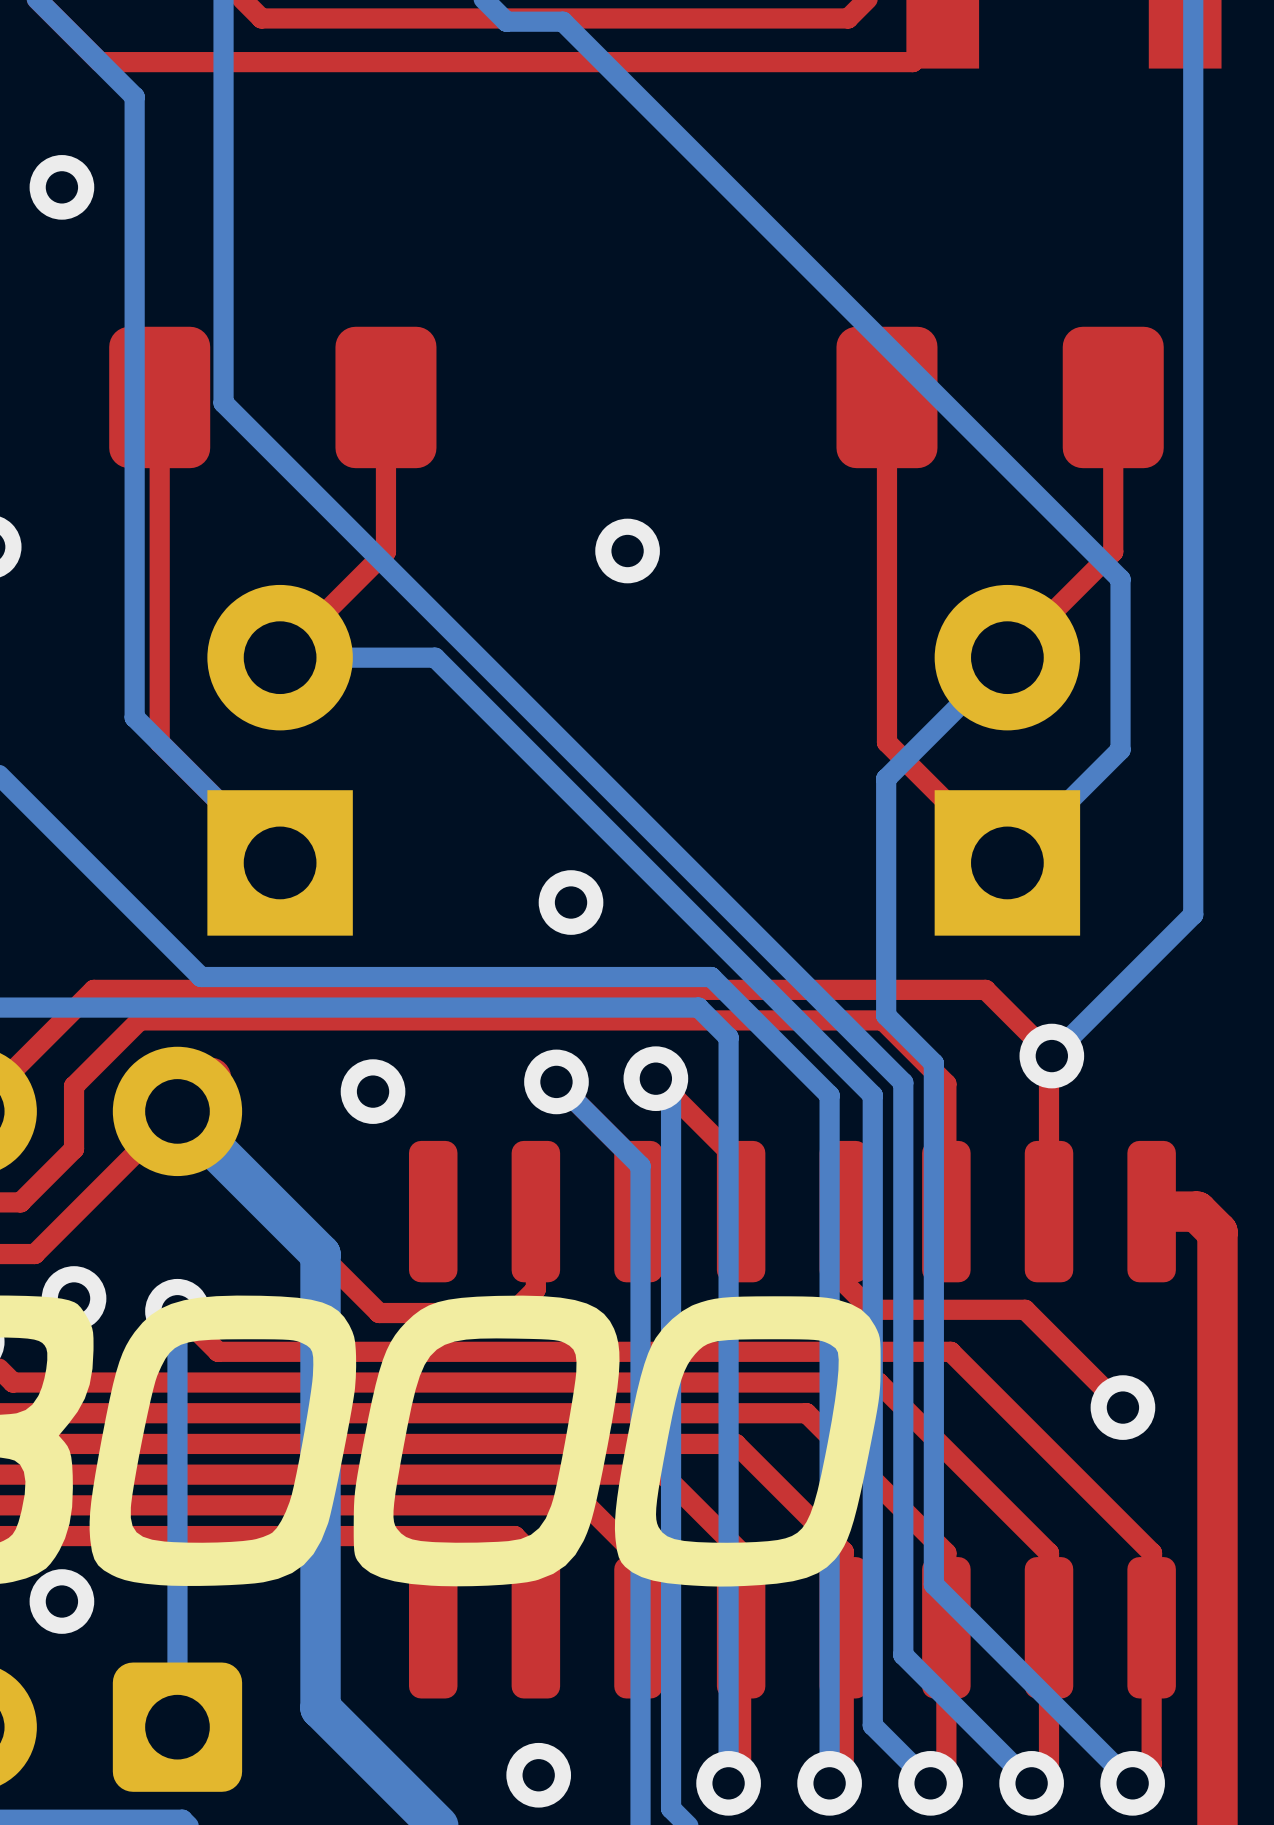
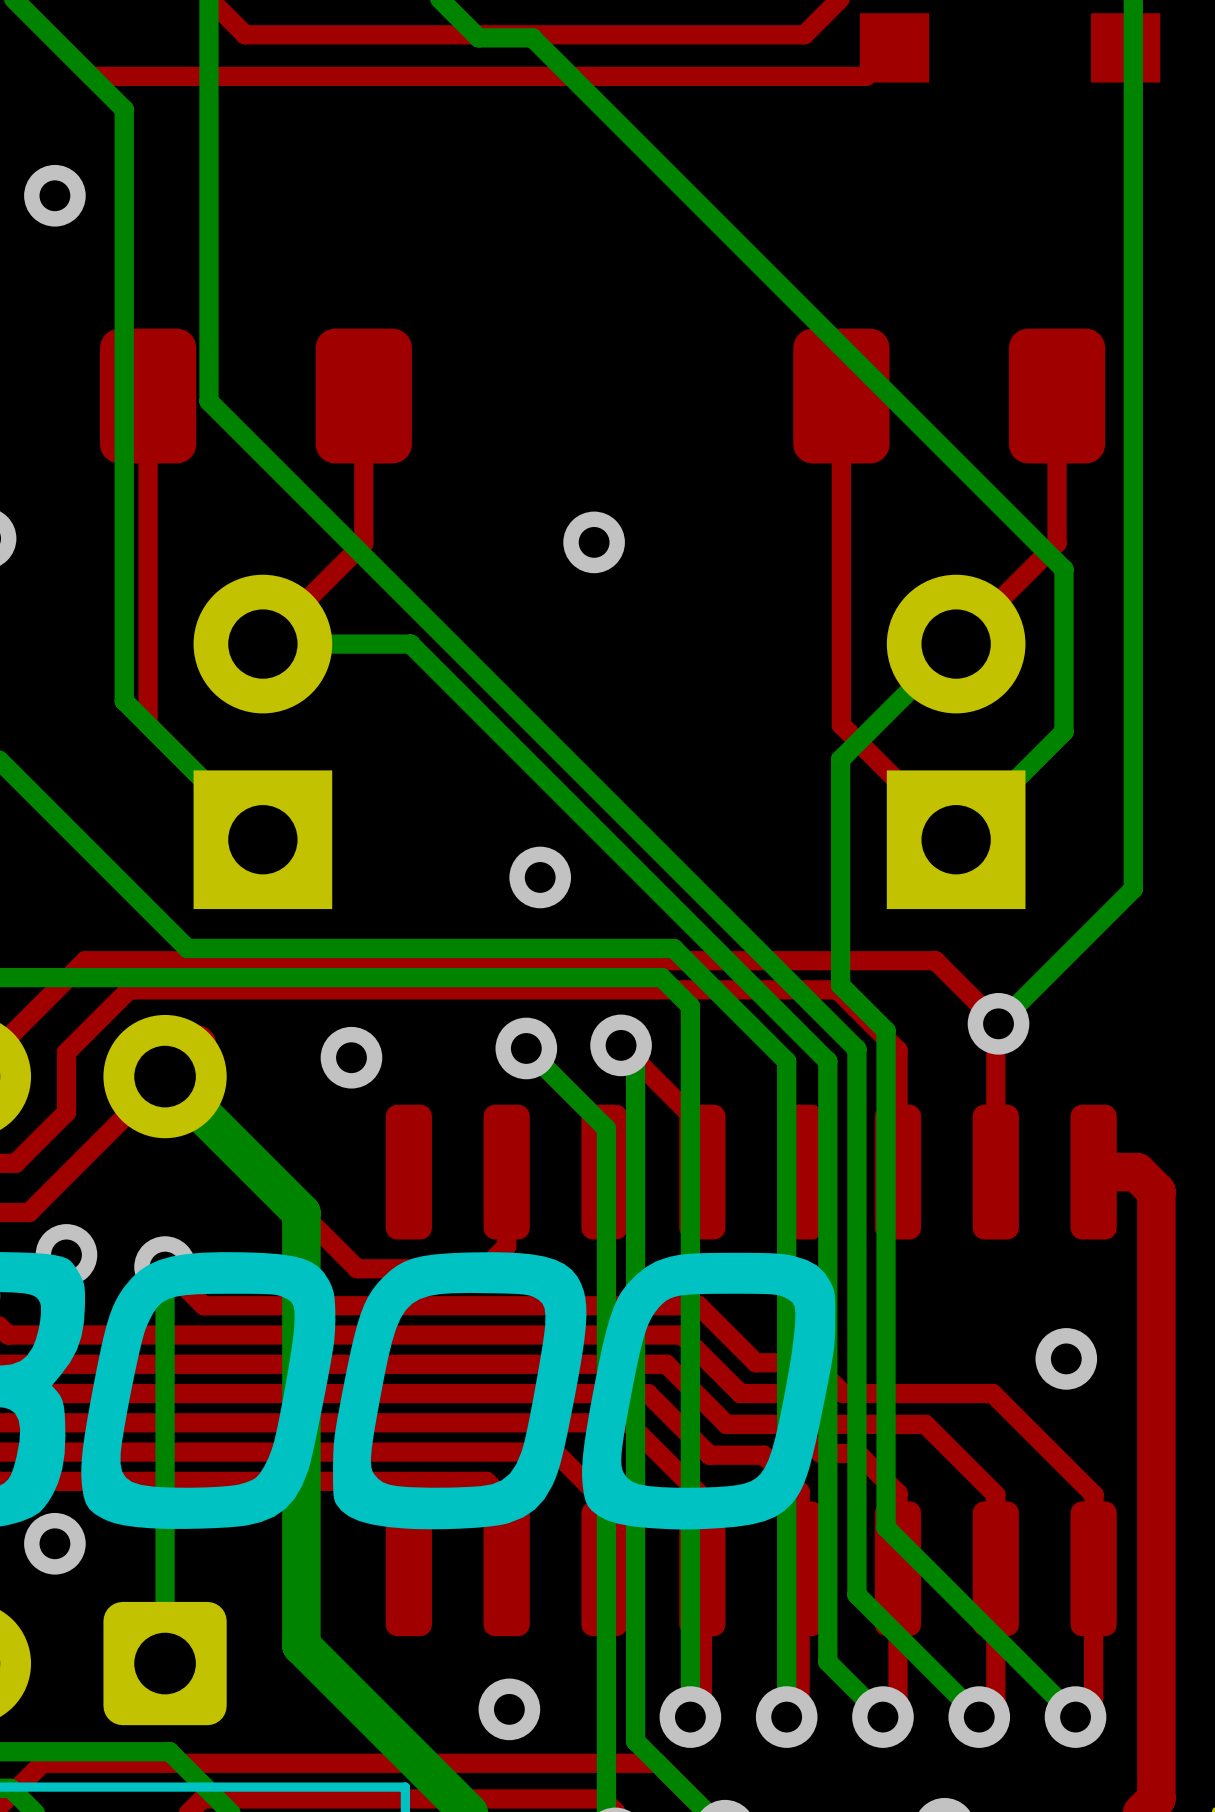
top track: (843, 1211) (843, 1282) (871, 1309) (1025, 1309) (1122, 1407) -> none
top track: (737, 1351) (950, 1351) (1152, 1553) -> (698, 1305) (755, 1362) (809, 1362) (814, 1364) (843, 1393) (992, 1393) (1094, 1494) (1094, 1497)
top track: (719, 1382) (878, 1382) (1049, 1553) -> (681, 1335) (740, 1393) (802, 1393) (832, 1424) (925, 1424) (995, 1494) (995, 1497)
top track: (703, 1413) (806, 1413) (946, 1553) -> (666, 1364) (726, 1424) (791, 1424) (820, 1453) (858, 1453) (897, 1493) (897, 1497)
top track: (684, 1443) (735, 1443) (843, 1551) -> (648, 1393) (709, 1455) (763, 1455) (800, 1491) (800, 1496)

